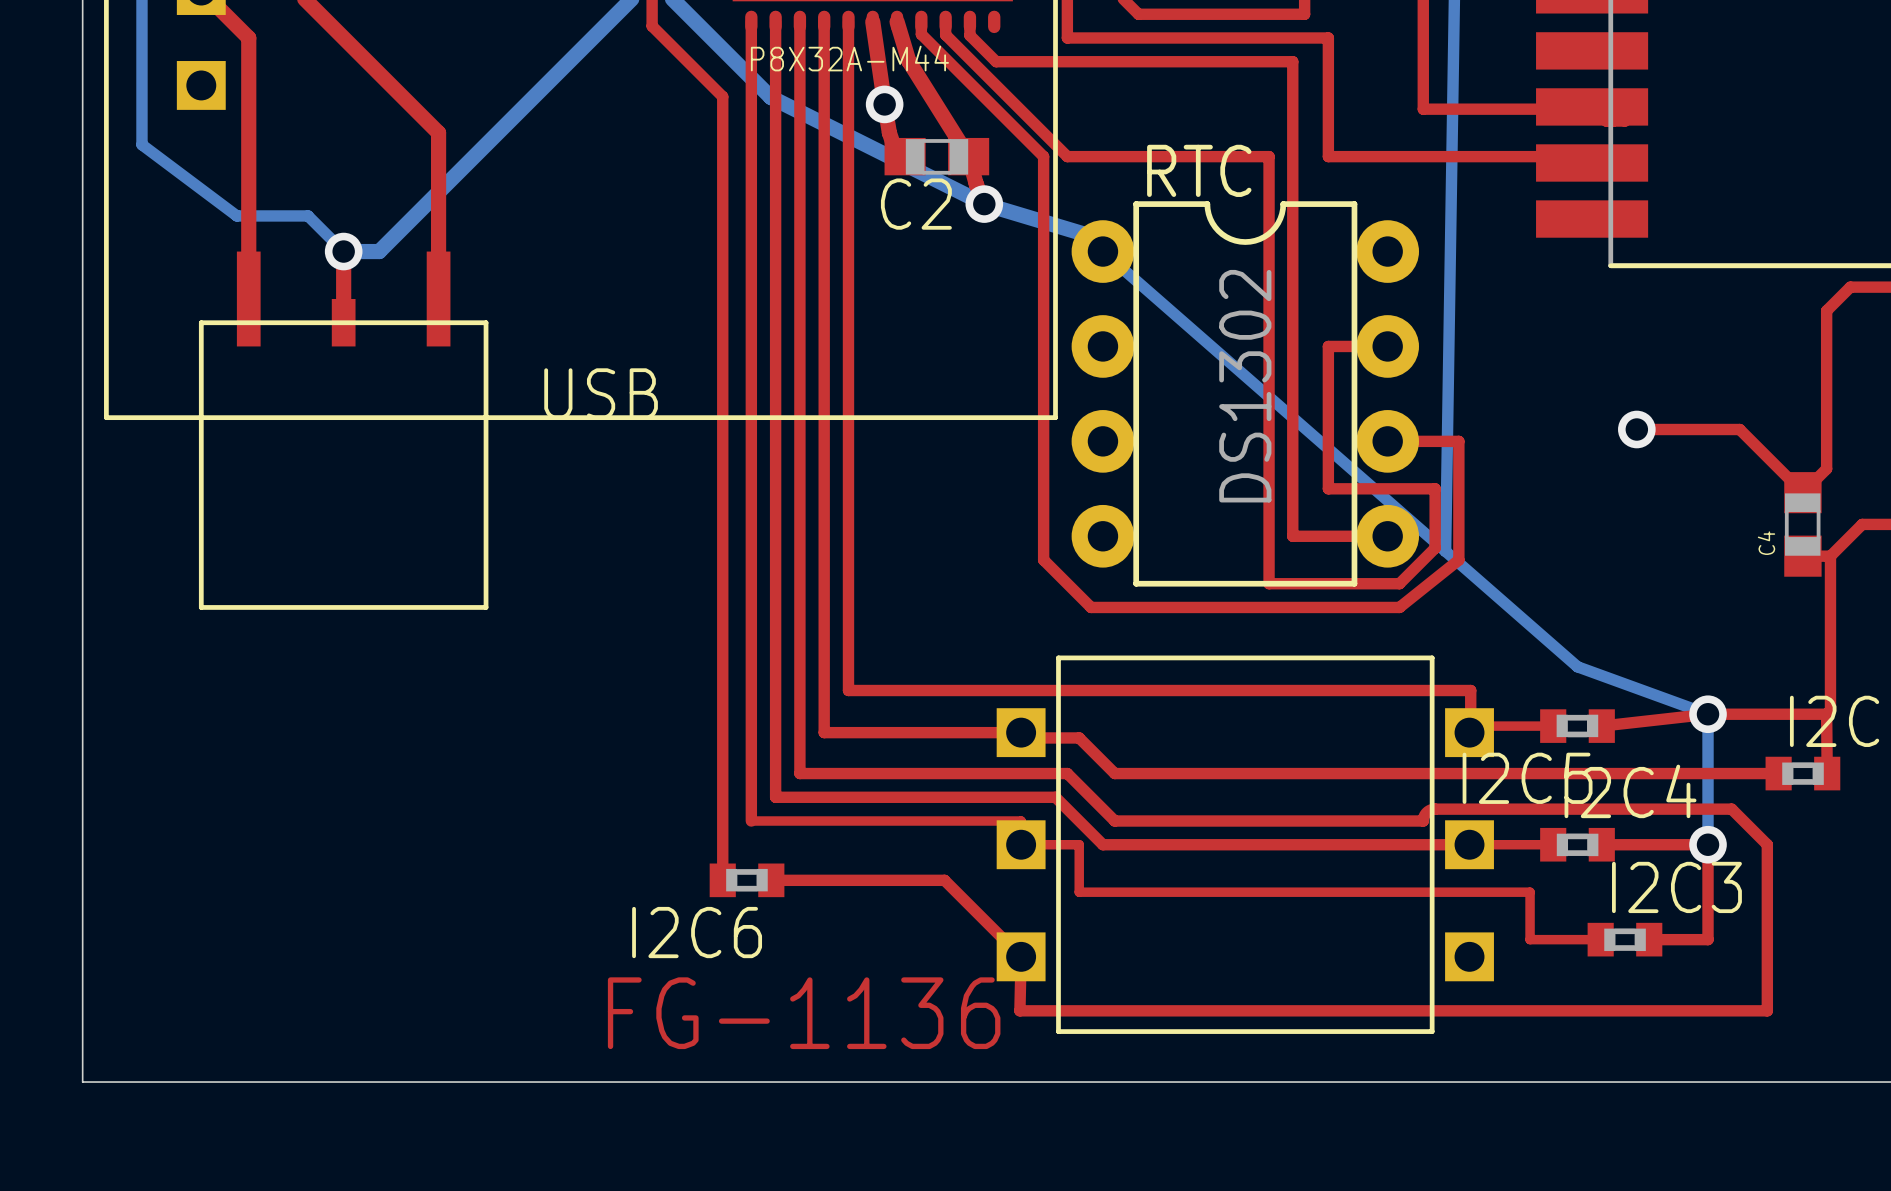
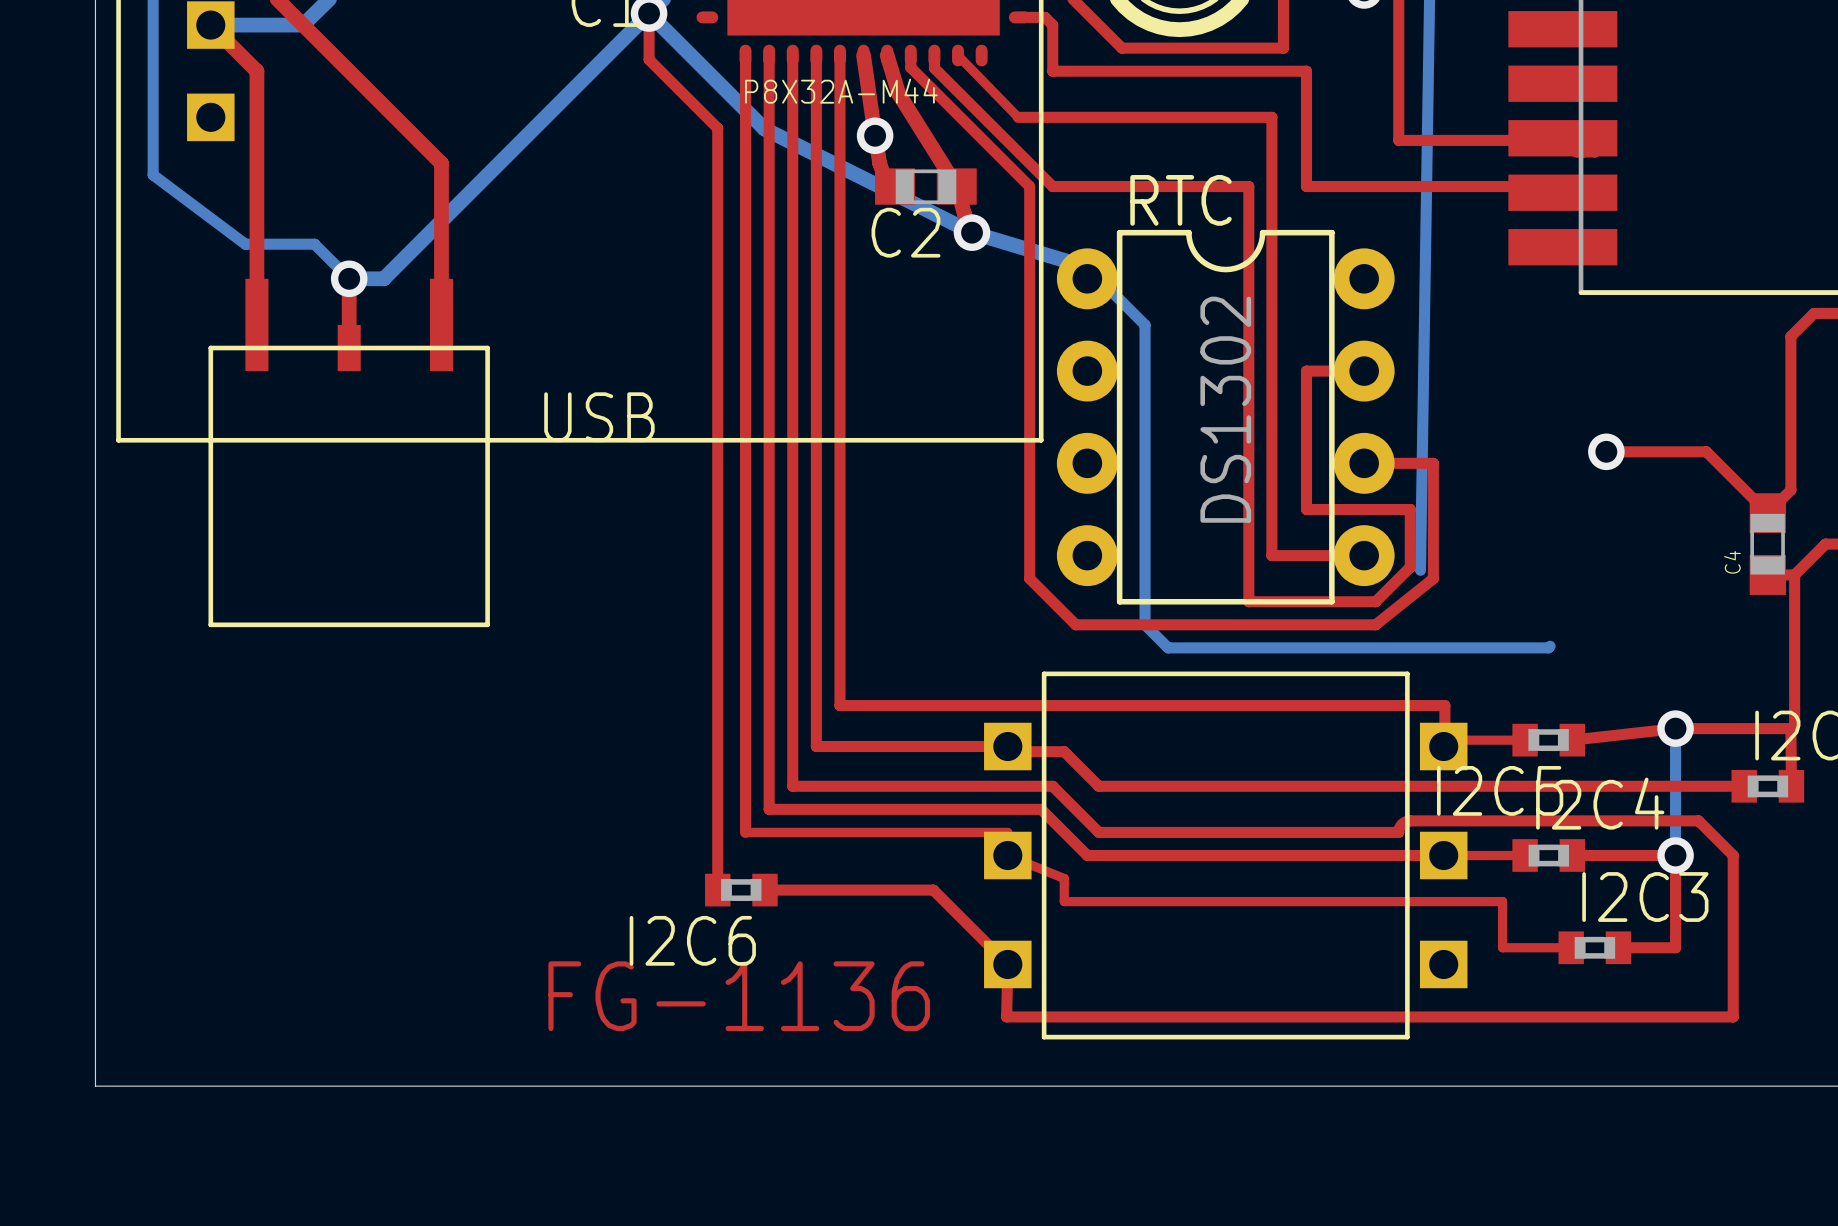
top track: (969, 21) (969, 35) (996, 61) (1292, 61) (1292, 85) -> (958, 55) (1018, 117) (1271, 117)
bottom track: (1102, 251) (1577, 666) (1708, 714) -> (1087, 278) (1098, 278) (1145, 324) (1145, 624) (1168, 647) (1548, 647) (1550, 646)
top track: (1021, 844) (1079, 844) (1079, 868) -> (1007, 855) (1064, 878)
text position: FG-1136 (804, 1013) -> FG-1136 (739, 996)

